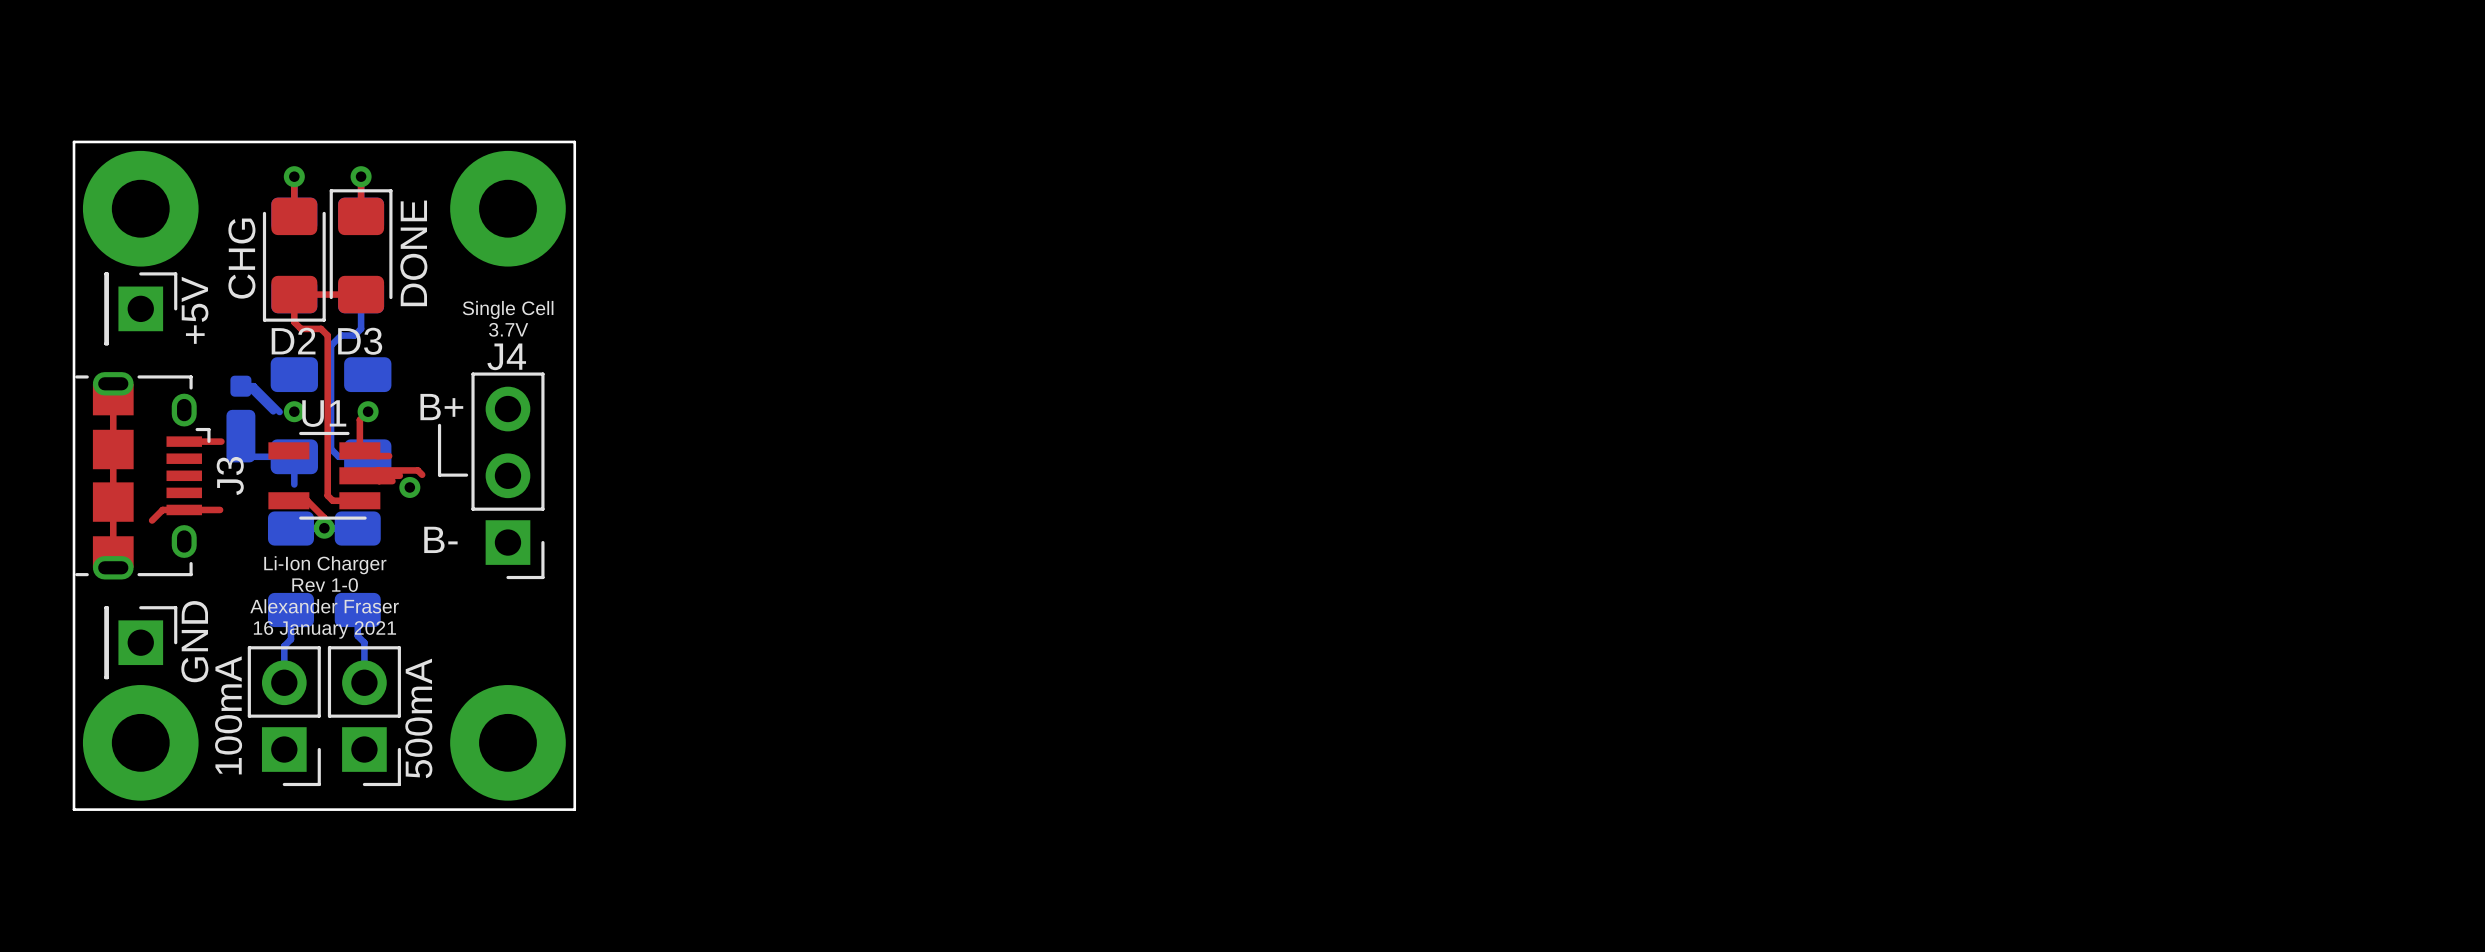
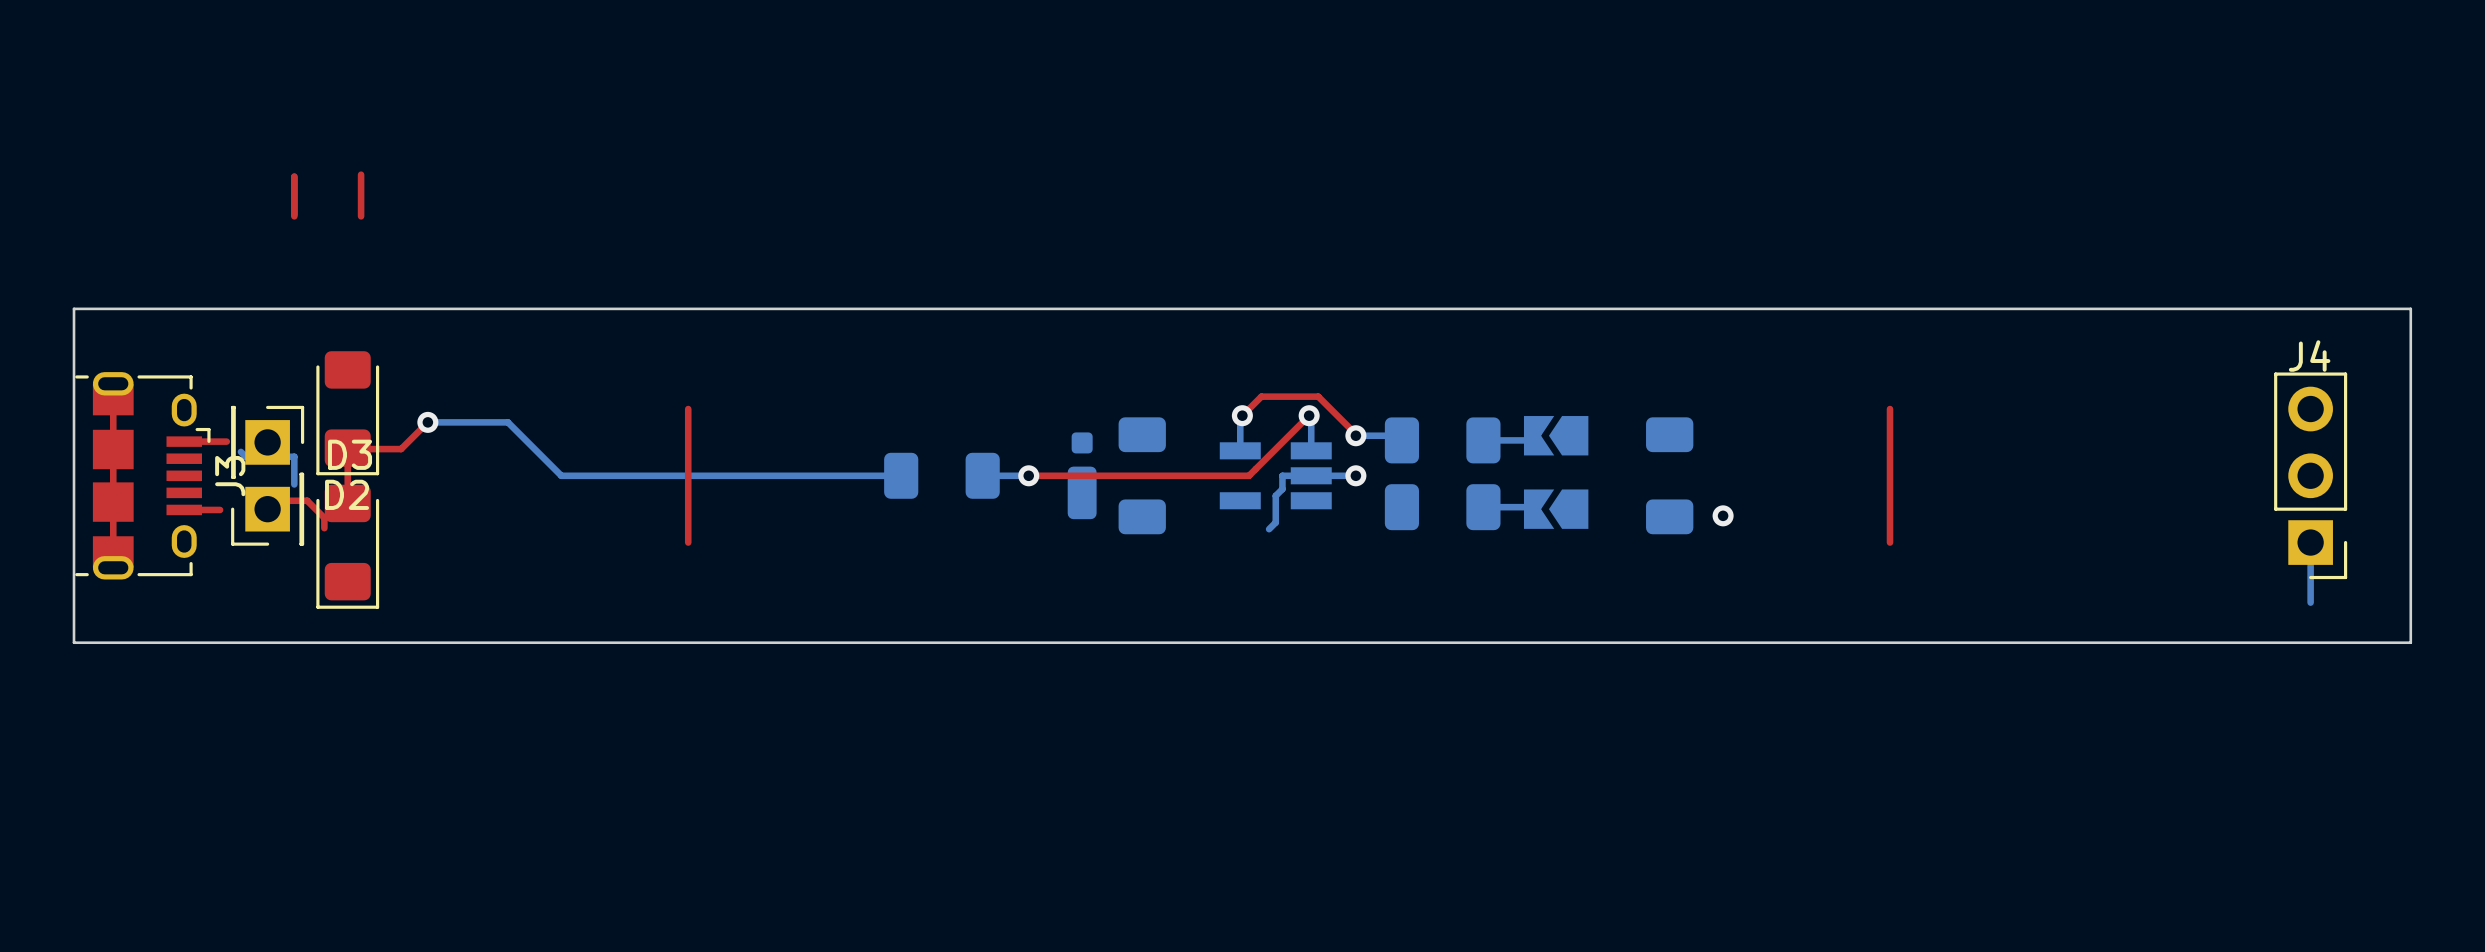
via: (294, 176) -> none
via: (361, 176) -> none
part: (140, 208) -> none
part: (507, 208) -> none
D3 rotation: 0° (361, 251) -> 180° (347, 546)
D3 position: (361, 251) -> (347, 546)
text: DONE (413, 253) -> none
text: CHG (241, 258) -> none
D2 position: (294, 259) -> (347, 413)
top track: (361, 294) (294, 294) (294, 322) (301, 328) (321, 328) (327, 335) (327, 495) (332, 500) (359, 500) -> none
bottom track: (361, 296) (361, 328) (354, 335) (341, 335) (331, 345) (331, 449) (338, 456) (367, 456) -> none
board edge: (74, 308) (74, 141) (574, 141) (574, 809) (74, 809) (74, 642) -> (74, 308) (2410, 308) (2410, 642) (74, 642)
part: (140, 308) -> none
text: Single Cell (508, 309) -> none
text: +5V (195, 310) -> none
text: 3.7V (508, 329) -> none
bottom track: (240, 386) (253, 386) (279, 412) -> none
bottom track: (248, 386) (273, 411) -> none
text: B+ (441, 407) -> none
top track: none -> (688, 409) (688, 542)
top track: none -> (1890, 409) (1890, 542)
via: (294, 411) -> none
top track: (368, 411) (359, 419) (359, 450) (372, 450) (377, 456) (389, 456) -> none
via: (368, 411) -> none
part: (294, 415) -> none
part: (367, 415) -> none
bottom track: none -> (1242, 415) (1240, 417) (1240, 450)
top track: none -> (1242, 415) (1261, 396) (1318, 396) (1355, 435)
via: none -> (1242, 415)
bottom track: none -> (1309, 415) (1311, 417) (1311, 450)
top track: none -> (1309, 415) (1249, 475) (1028, 475)
via: none -> (1309, 415)
part: (240, 419) -> none
bottom track: none -> (427, 422) (507, 422) (561, 475) (901, 475)
top track: none -> (427, 422) (401, 449) (347, 448) (347, 503)
via: none -> (427, 422)
line: (439, 425) (439, 475) (466, 475) -> none
bottom track: none -> (1355, 435) (1397, 435)
via: none -> (1355, 435)
bottom track: none -> (1537, 435) (1532, 440) (1483, 440)
part: none -> (1556, 435)
part: none -> (1442, 440)
top track: none -> (221, 441) (226, 441)
part: none -> (267, 442)
top track: (422, 474) (417, 470) (378, 470) (372, 475) -> none
U1: (324, 475) -> none
top track: (359, 475) (399, 475) -> none
top track: (373, 475) (379, 481) (392, 481) -> none
J4 position: (507, 475) -> (2310, 475)
part: none -> (941, 475)
bottom track: none -> (989, 475) (1028, 475)
via: none -> (1028, 475)
part: none -> (1082, 475)
part: none -> (1142, 475)
part: none -> (1275, 475)
bottom track: none -> (1355, 475) (1282, 475) (1282, 489) (1275, 495) (1275, 522) (1269, 529)
via: none -> (1355, 475)
part: none -> (1669, 475)
via: (409, 487) -> none
part: none -> (1442, 507)
bottom track: none -> (1483, 507) (1535, 507) (1537, 509)
top track: (184, 509) (162, 509) (152, 520) -> none
part: none -> (267, 509)
part: none -> (1556, 509)
via: none -> (1723, 515)
via: (324, 528) -> none
text: B- (440, 539) -> none
bottom track: none -> (2310, 542) (2310, 602)
text: Li-Ion Charger (325, 565) -> none
part: (290, 569) -> none
part: (357, 569) -> none
text: Rev 1-0 (325, 585) -> none
text: Alexander Fraser (324, 606) -> none
bottom track: (290, 610) (290, 639) (284, 646) (284, 682) -> none
bottom track: (357, 610) (357, 636) (364, 642) (364, 682) -> none
text: 16 January 2021 (324, 629) -> none
text: GND (194, 641) -> none
part: (140, 642) -> none
text: 100mA (228, 715) -> none
part: (284, 716) -> none
part: (364, 716) -> none
text: 500mA (418, 718) -> none
part: (140, 742) -> none
part: (507, 742) -> none

